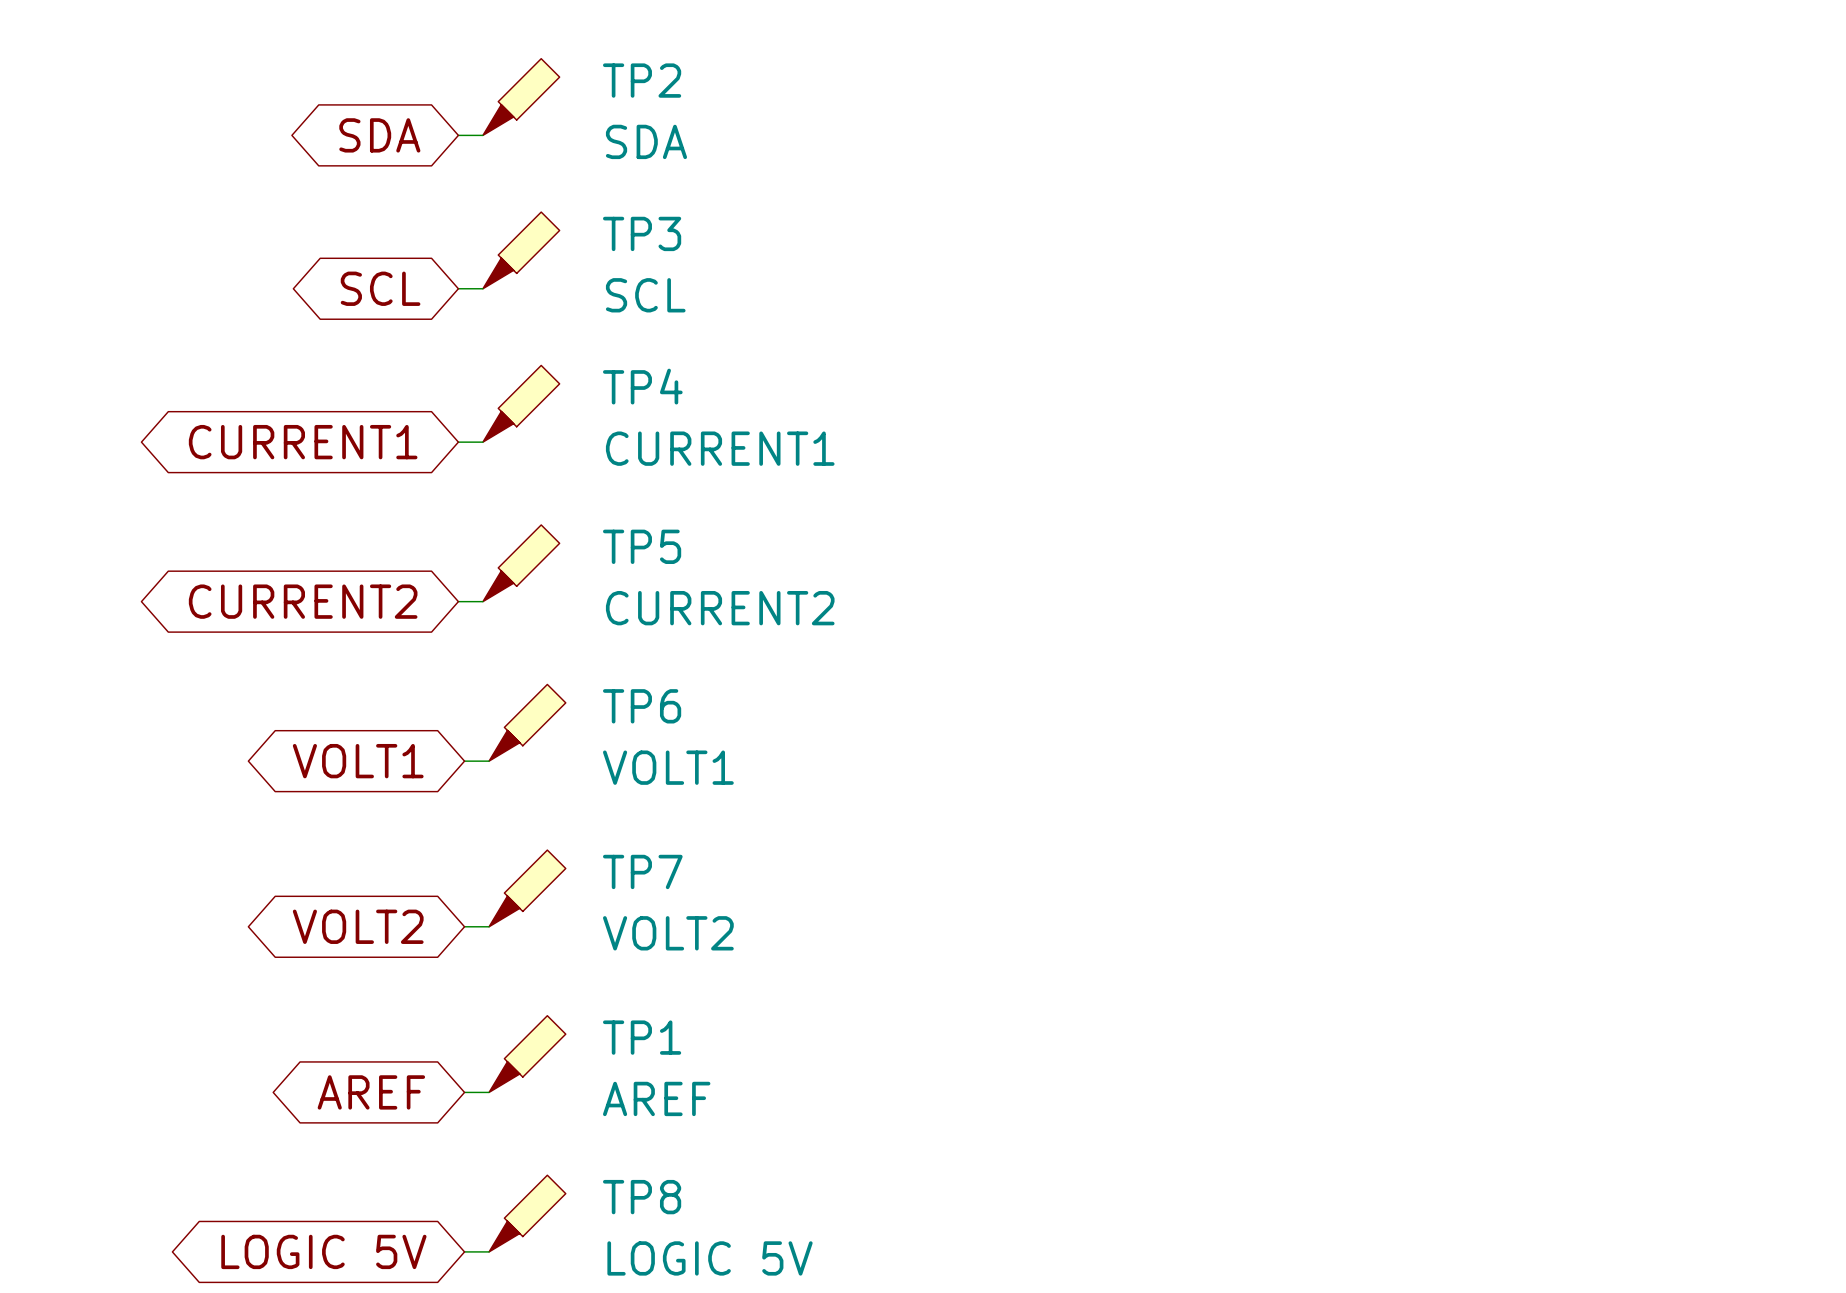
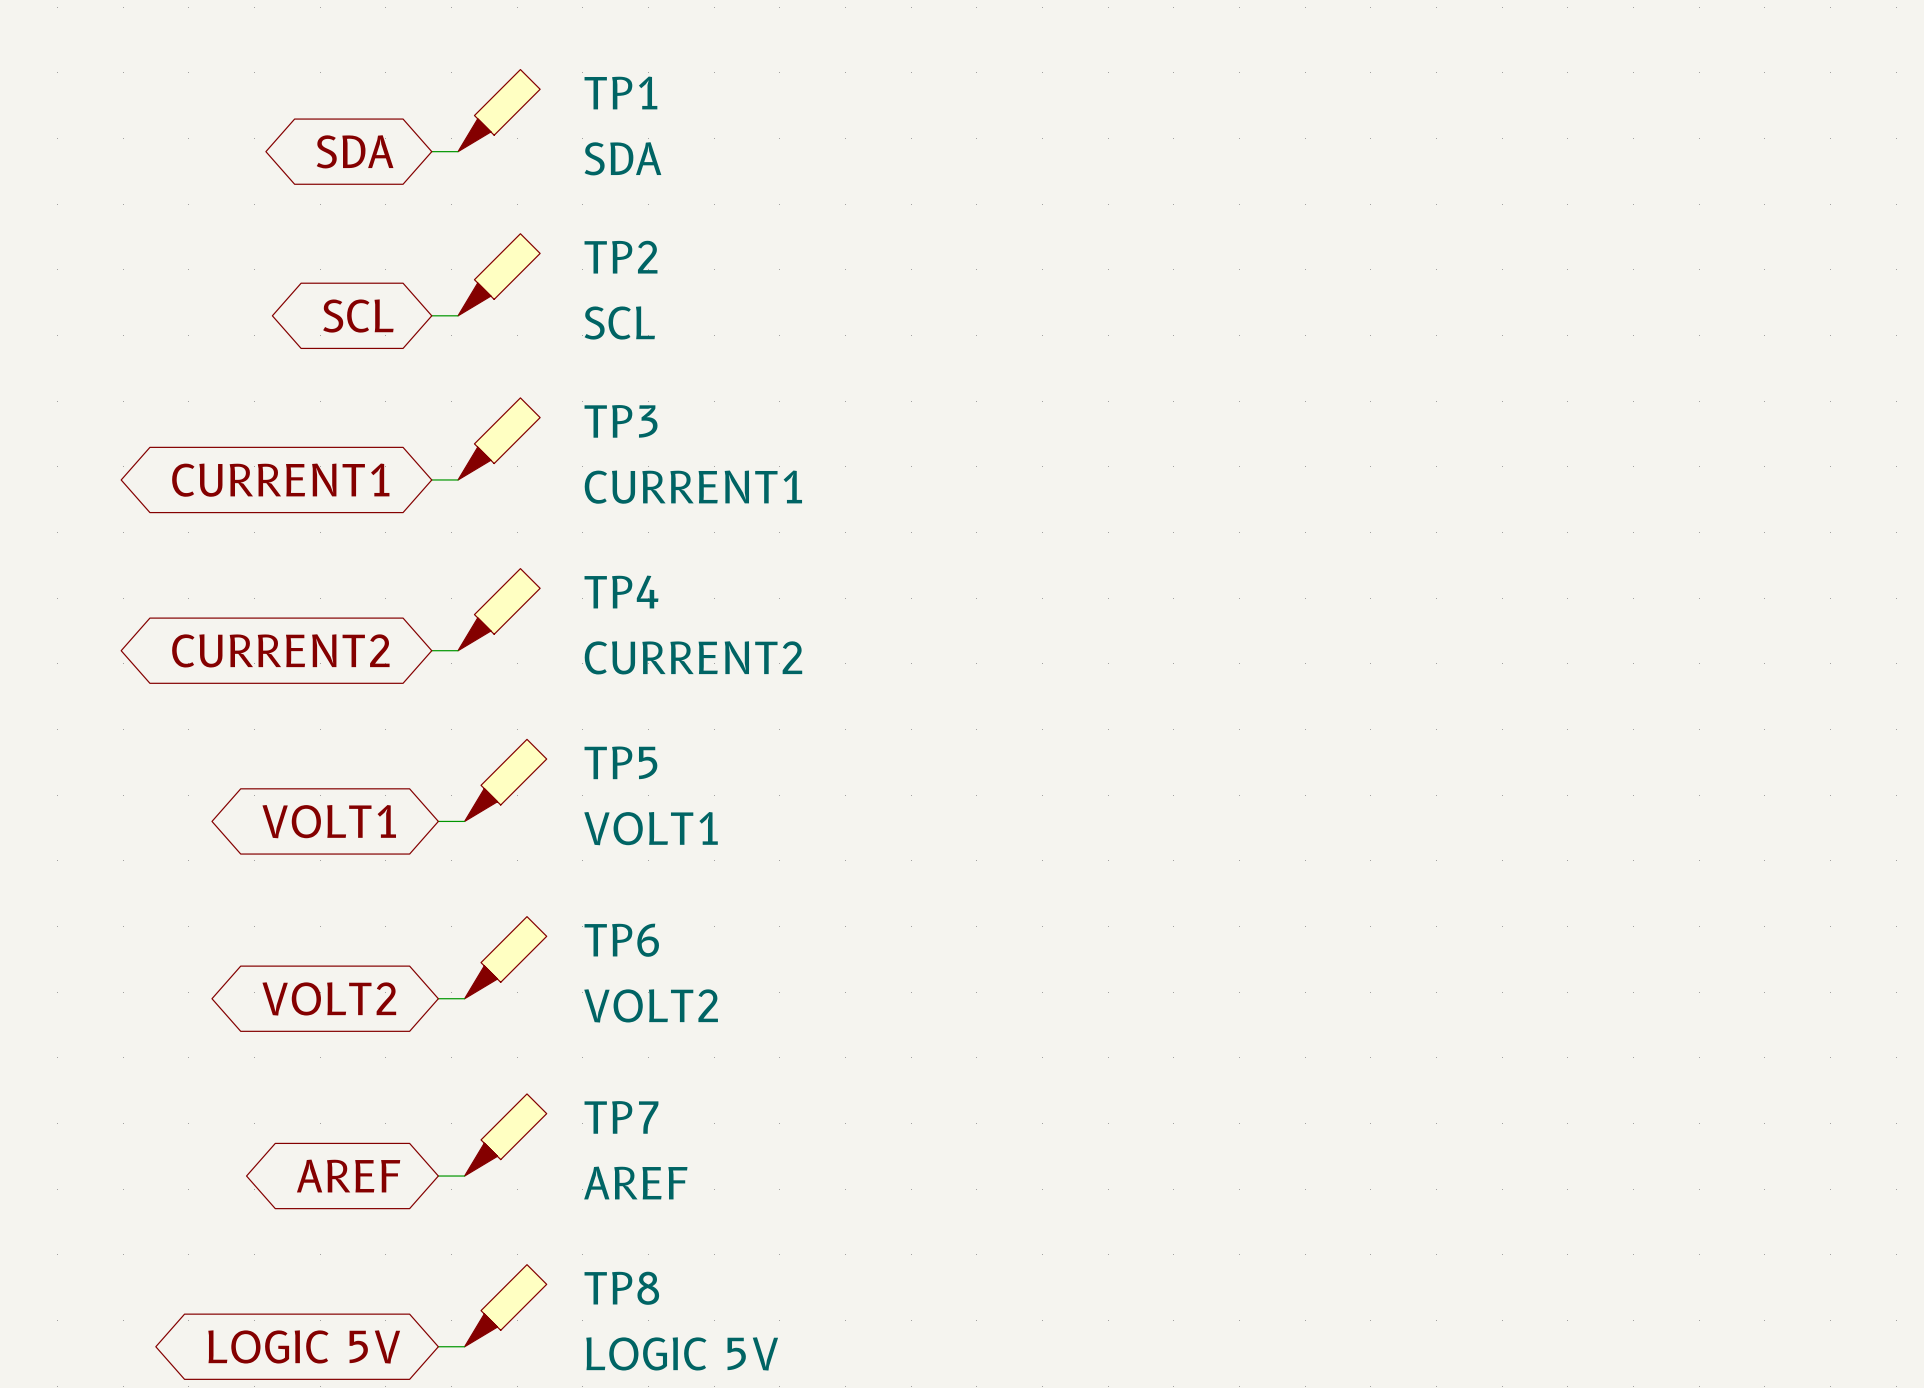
TP2 name: TP2 (642, 80) -> TP1 (620, 92)
TP3 name: TP3 (642, 233) -> TP2 (621, 257)
TP4 name: TP4 (642, 386) -> TP3 (621, 421)
TP5 name: TP5 (642, 546) -> TP4 (621, 592)
TP6 name: TP6 (642, 706) -> TP5 (620, 762)
TP7 name: TP7 (642, 871) -> TP6 (621, 940)
TP1 name: TP1 (642, 1037) -> TP7 (621, 1117)

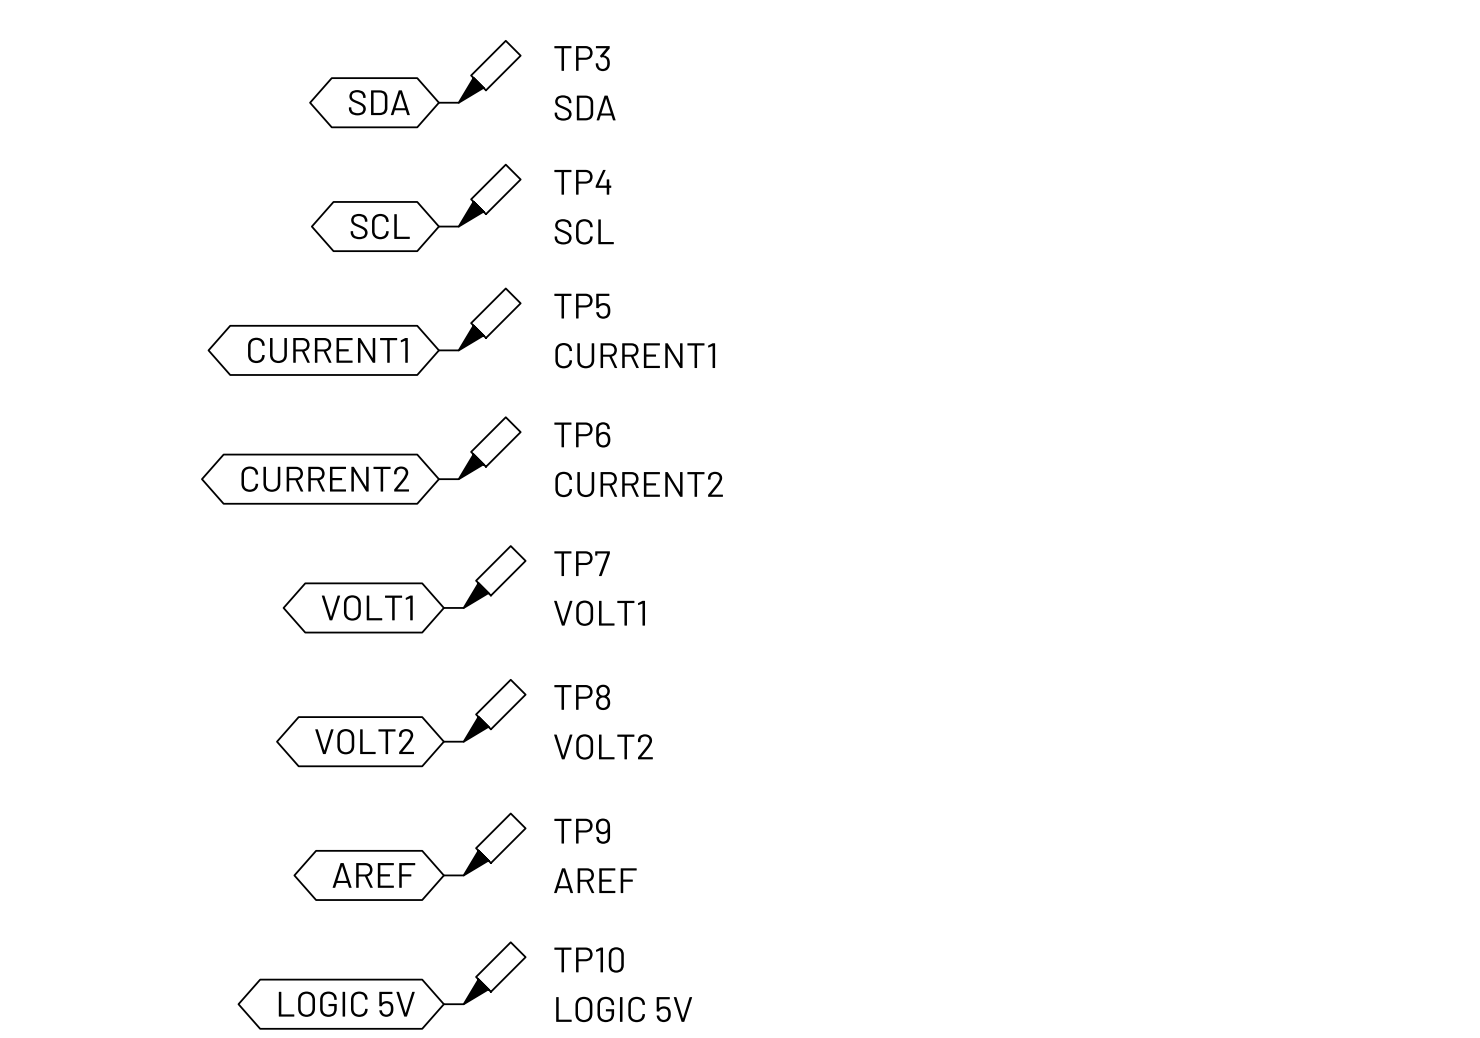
TP1 name: TP1 (620, 92) -> TP3 (582, 58)
TP2 name: TP2 (621, 257) -> TP4 (582, 182)
TP3 name: TP3 (621, 421) -> TP5 (582, 306)
TP4 name: TP4 (621, 592) -> TP6 (582, 434)
TP5 name: TP5 (620, 762) -> TP7 (582, 563)
TP6 name: TP6 (621, 940) -> TP8 (582, 697)
TP7 name: TP7 (621, 1117) -> TP9 (582, 831)
TP8 name: TP8 (621, 1288) -> TP10 (589, 959)

